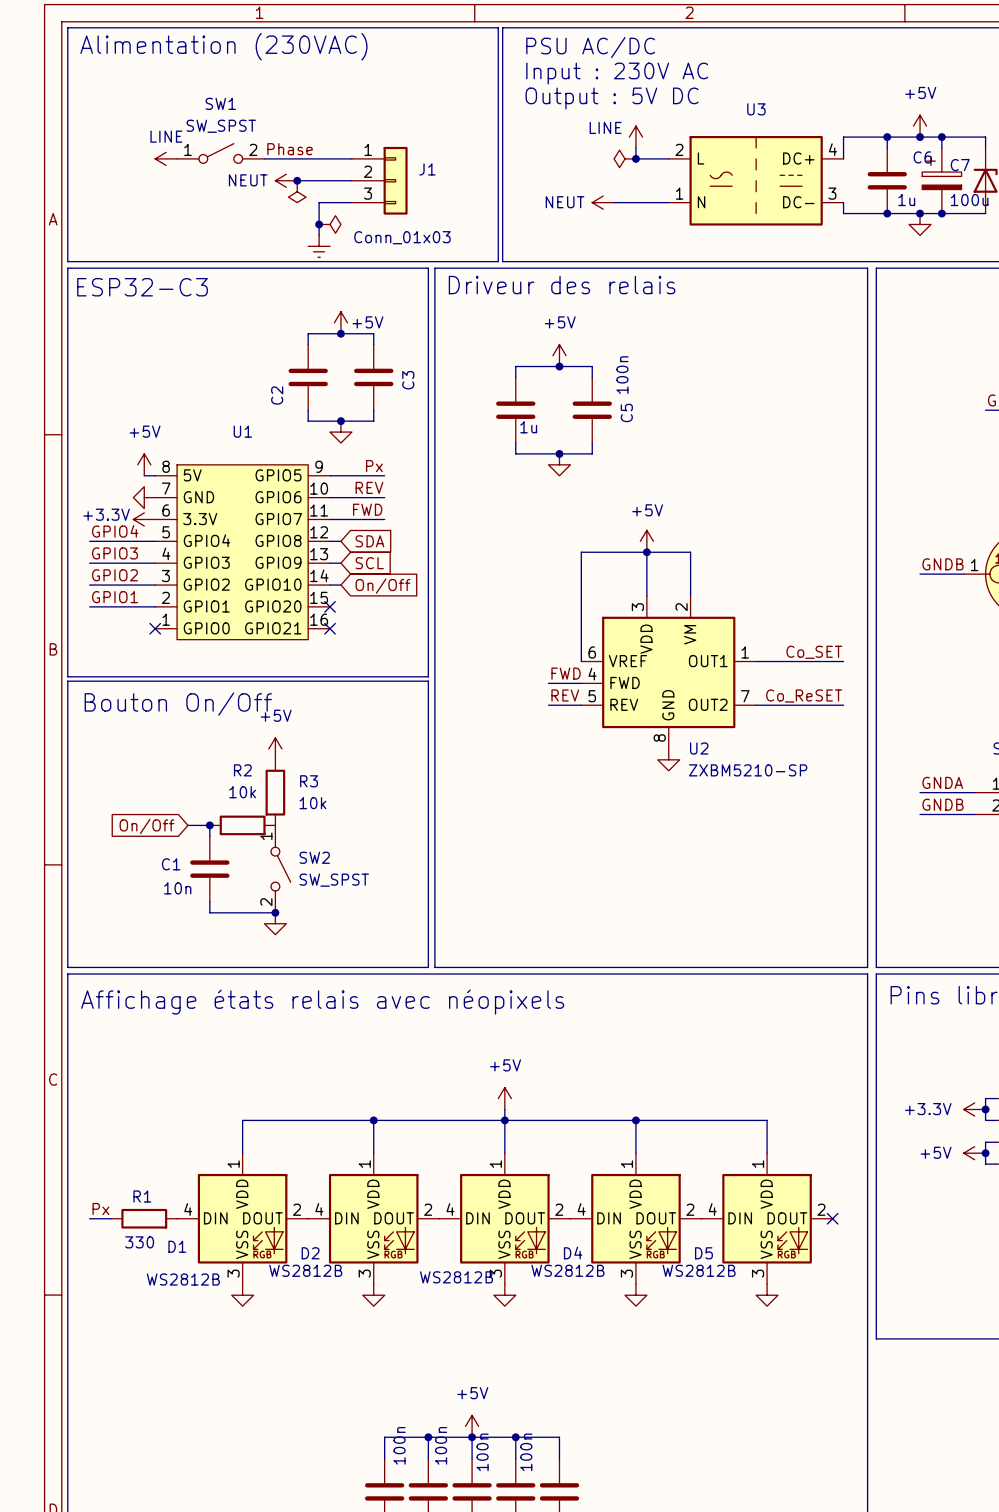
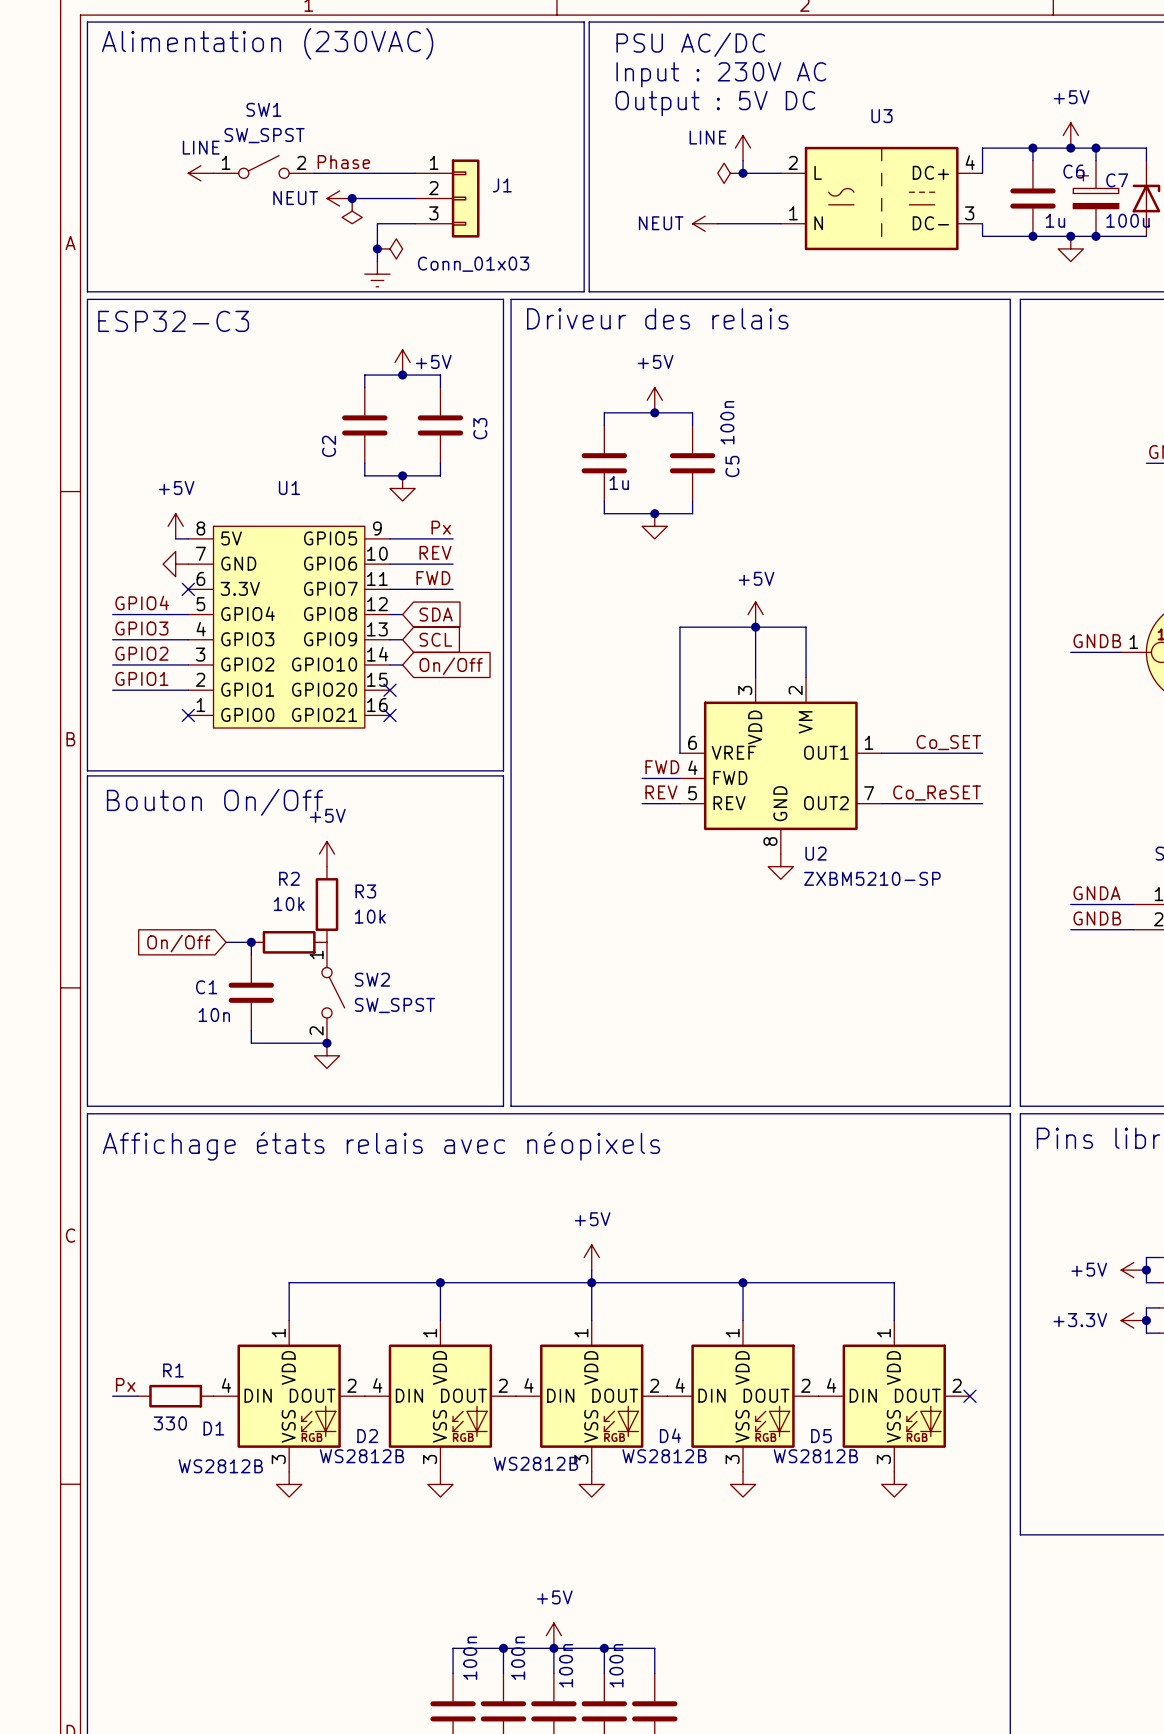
power symbol: +3.3V (144, 519) -> none
no-connect mark: none -> (188, 589)
power symbol: +3.3V (974, 1109) -> +5V (1133, 1270)
power symbol: +5V (974, 1153) -> +3.3V (1133, 1320)

